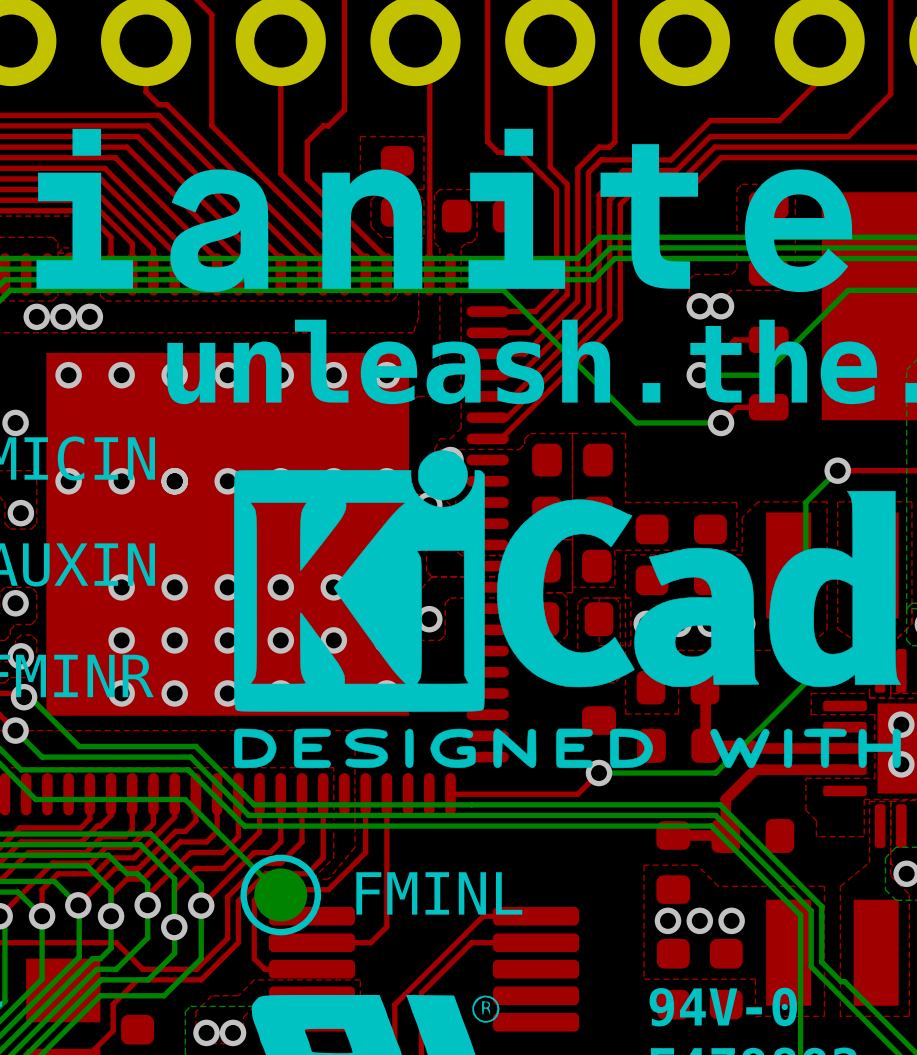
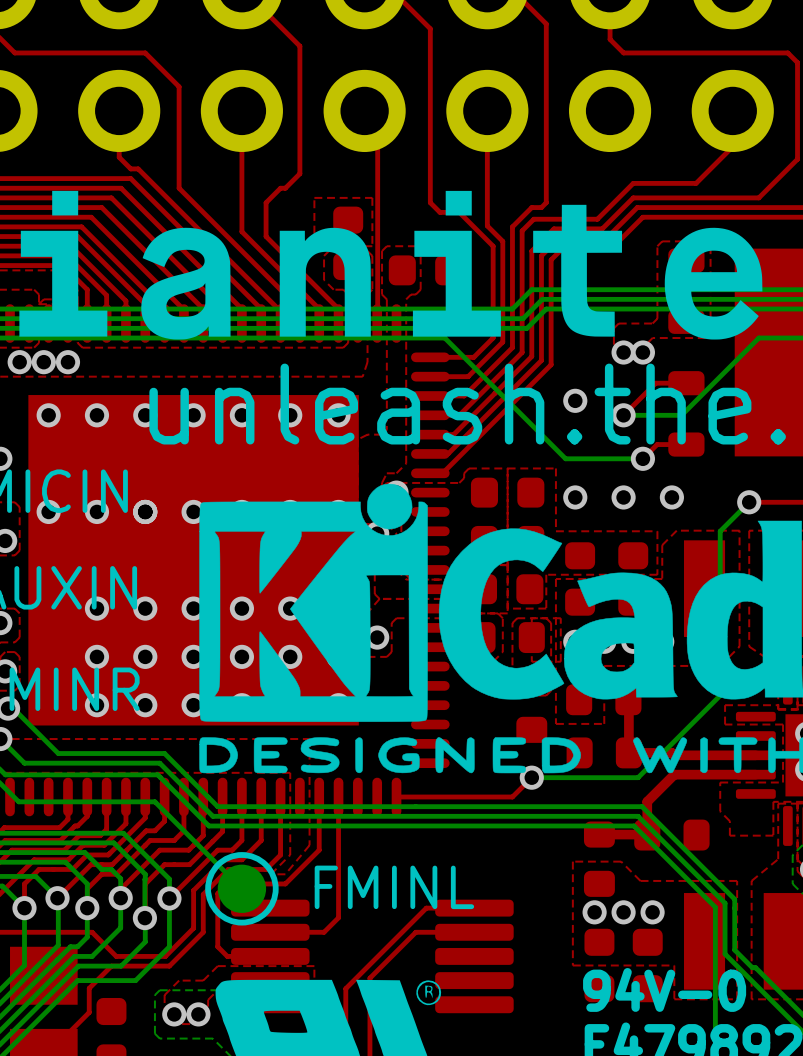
via: none -> (575, 400)
via: none -> (575, 497)
via: none -> (623, 497)
via: none -> (671, 497)

